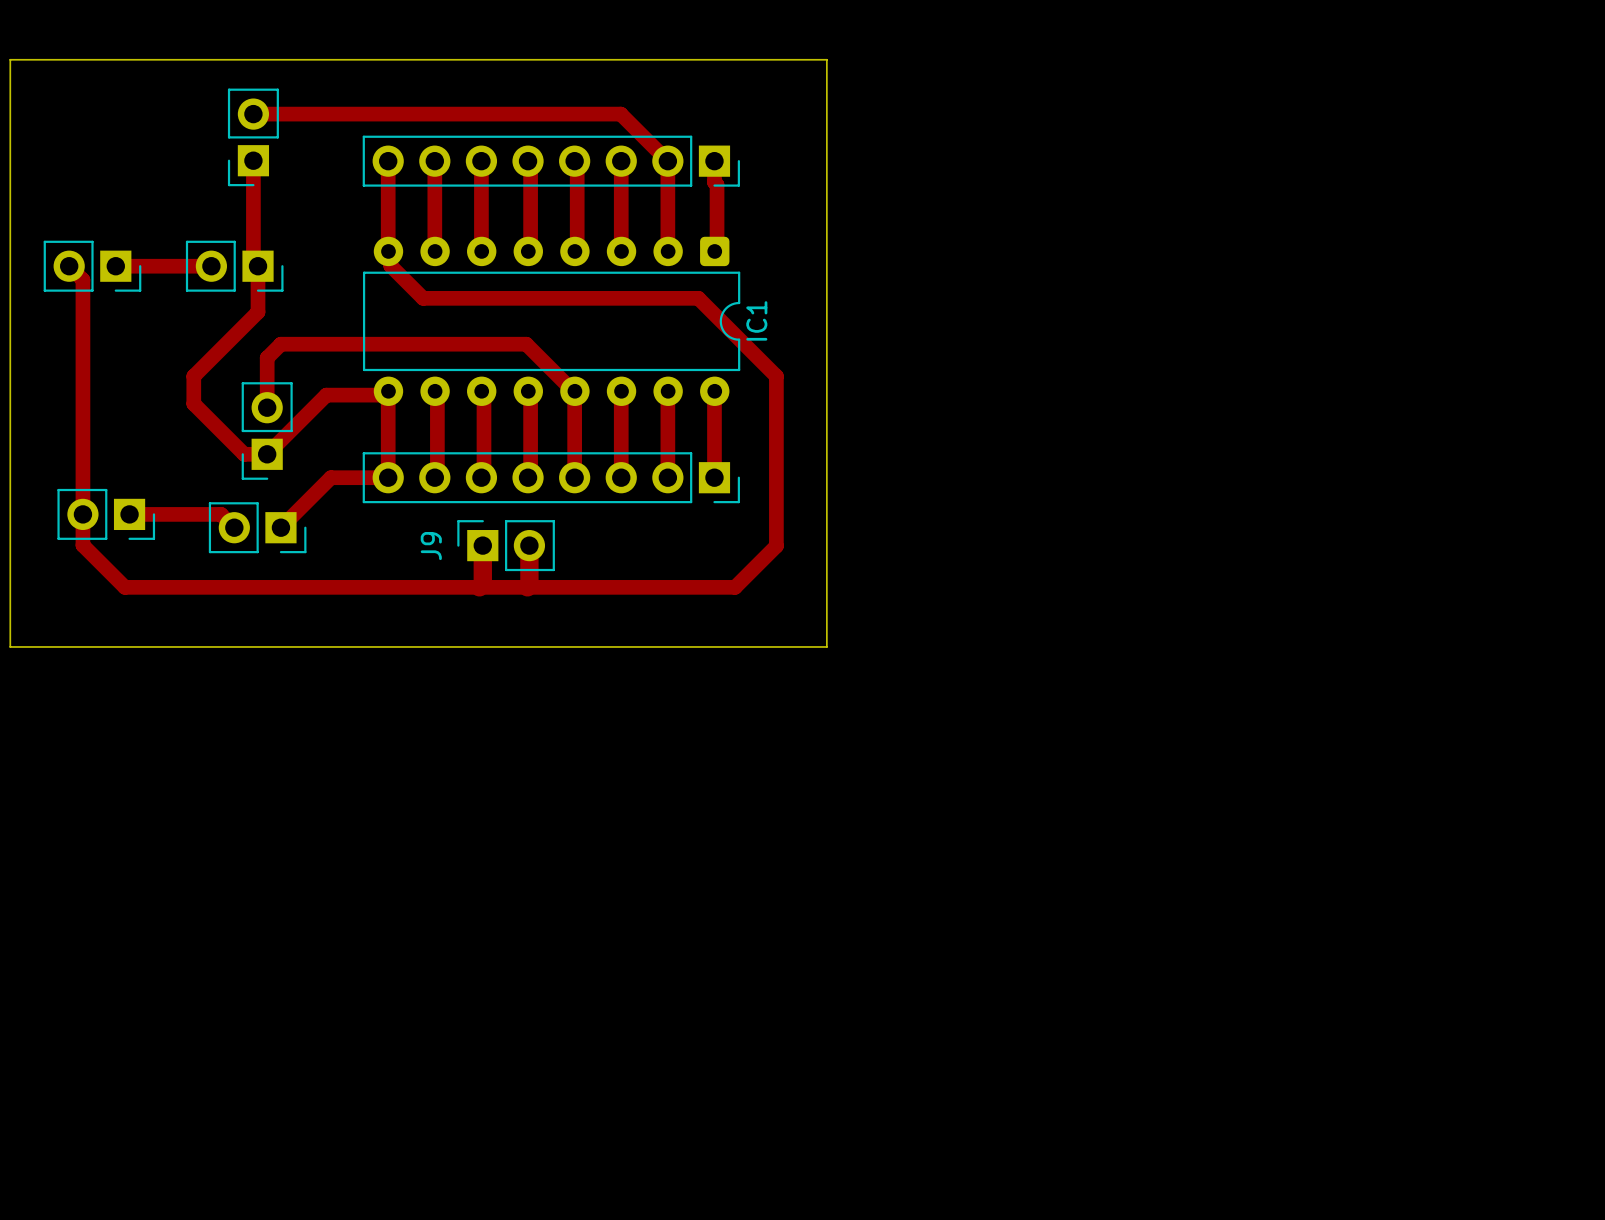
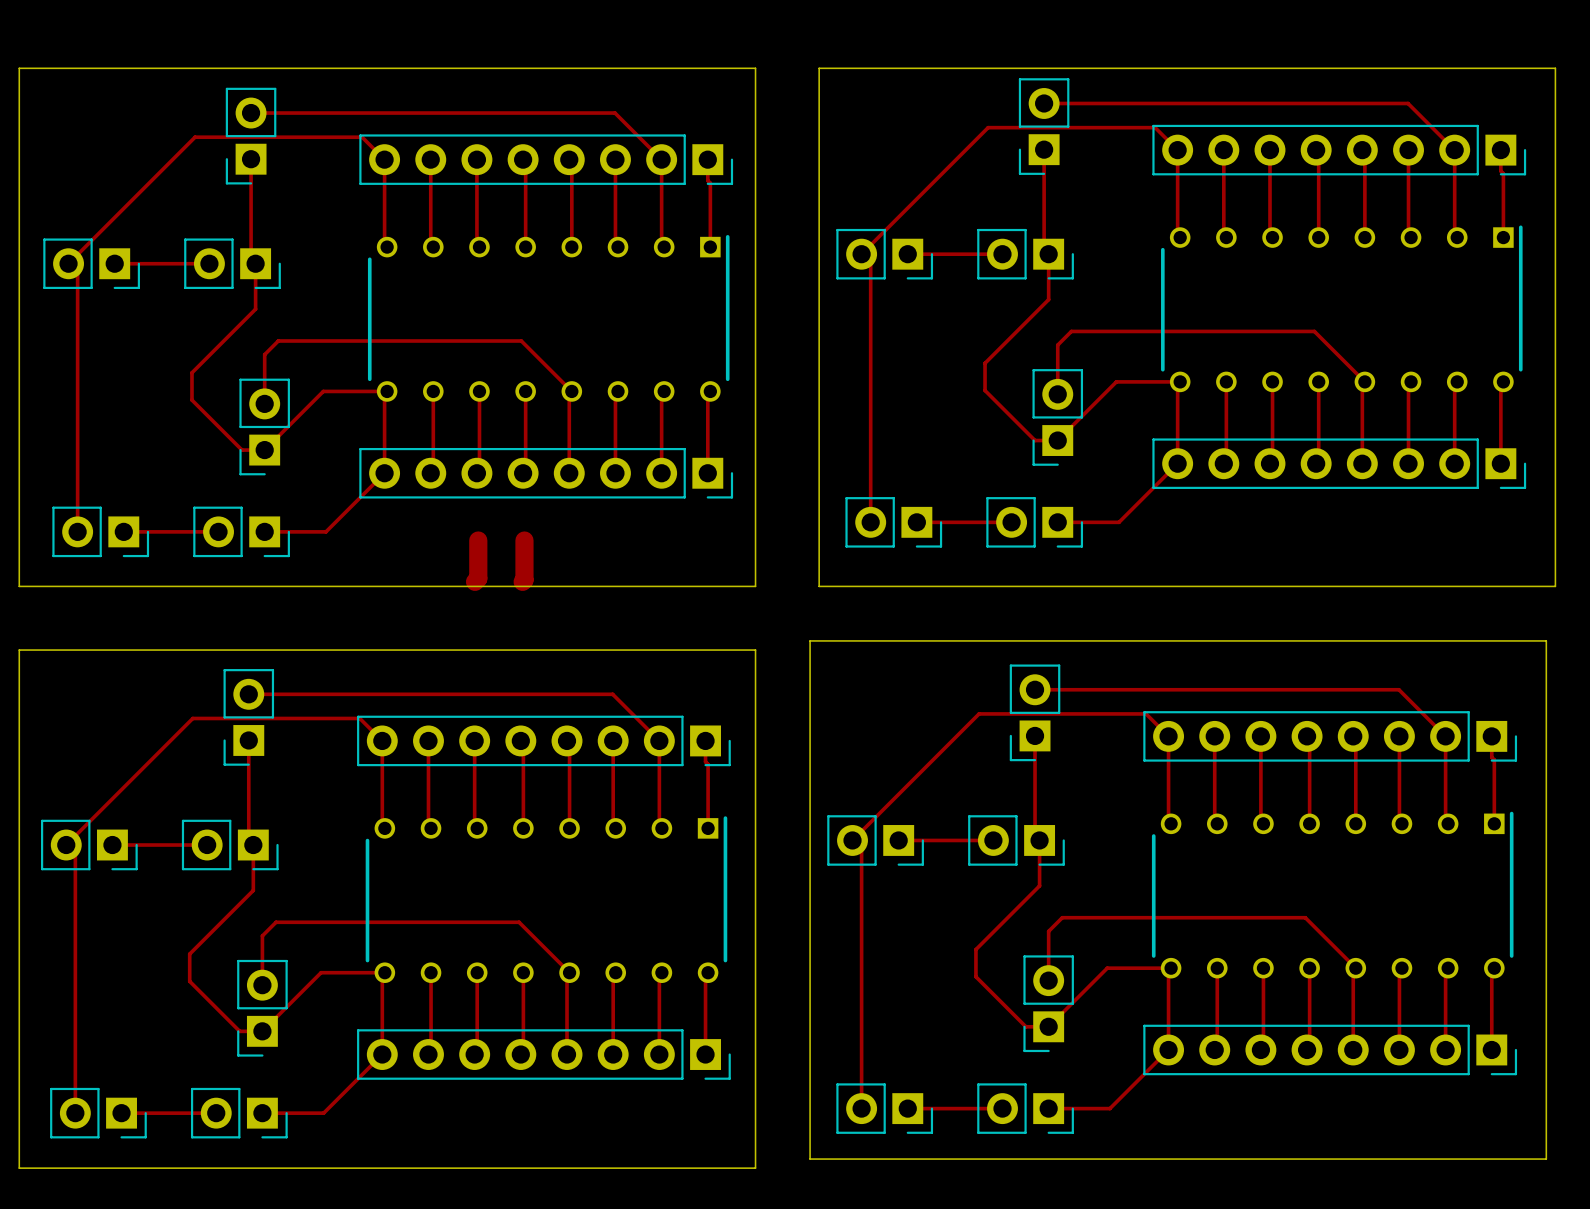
board edge: none -> (19, 68) (755, 68) (755, 586) (19, 586) (19, 68)
board edge: (826, 68) (826, 59) (10, 59) (10, 646) (817, 646) -> (819, 68) (1555, 68) (1555, 586) (819, 586)
track: none -> (1044, 103) (1408, 103) (1454, 150) (1454, 235) (1457, 237)
track width: thick (253, 114) (620, 114) (667, 161) (667, 246) (670, 249) -> thin (251, 113) (615, 113) (661, 159) (661, 244) (664, 247)
part: none -> (1044, 126)
track: none -> (1044, 149) (1044, 260) (1048, 264)
track: none -> (1223, 150) (1223, 235) (1226, 237)
track: none -> (1269, 150) (1269, 235) (1272, 237)
track: none -> (1316, 150) (1318, 152) (1318, 237)
part: none -> (1339, 150)
track: none -> (1362, 150) (1364, 152) (1364, 237)
track: none -> (1408, 150) (1408, 235) (1411, 237)
track: none -> (1500, 150) (1500, 171) (1503, 173) (1503, 237)
track width: thick (253, 160) (253, 272) (258, 276) -> thin (251, 159) (251, 269) (255, 274)
track: none -> (384, 159) (362, 137) (195, 137) (68, 263)
track width: thick (388, 161) (388, 246) (390, 249) -> thin (384, 159) (384, 244) (387, 247)
track width: thick (434, 161) (434, 246) (437, 249) -> thin (430, 159) (430, 244) (433, 247)
track width: thick (481, 161) (481, 246) (483, 249) -> thin (476, 159) (476, 244) (479, 247)
track width: thick (528, 161) (530, 163) (530, 249) -> thin (523, 159) (525, 162) (525, 247)
track width: thick (574, 161) (577, 163) (577, 249) -> thin (569, 159) (571, 162) (571, 247)
track width: thick (621, 161) (621, 246) (623, 249) -> thin (615, 159) (615, 244) (618, 247)
track width: thick (714, 161) (714, 182) (717, 184) (717, 249) -> thin (707, 159) (707, 180) (710, 183) (710, 247)
track: none -> (1180, 237) (1177, 235) (1177, 150) (1155, 127) (988, 127) (861, 254) (870, 263) (870, 522)
track: (390, 249) (390, 265) (423, 298) (698, 298) (776, 376) (776, 546) (735, 587) (124, 587) (82, 545) (82, 279) (78, 275) -> (77, 531) (77, 272)
part: none -> (884, 254)
track: none -> (907, 254) (1002, 254)
part: none -> (1025, 254)
track: none -> (1048, 254) (1048, 299) (985, 363) (985, 390) (1035, 440) (1057, 440) (1116, 381) (1180, 381) (1177, 384) (1177, 463) (1119, 522) (1057, 522)
track width: thick (115, 266) (211, 266) -> thin (114, 263) (209, 263)
track width: thick (258, 266) (258, 312) (193, 376) (193, 403) (244, 454) (267, 454) (326, 395) (390, 395) (388, 397) (388, 477) -> thin (255, 263) (255, 309) (191, 372) (191, 400) (241, 450) (264, 450) (323, 391) (387, 391) (384, 393) (384, 473)
part: none -> (1341, 308)
IC1: (551, 321) -> none
part: none -> (548, 318)
track: none -> (1226, 381) (1226, 461) (1223, 463)
track: none -> (1272, 381) (1272, 461) (1269, 463)
track: none -> (1318, 381) (1318, 461) (1316, 463)
track: none -> (1411, 381) (1408, 384) (1408, 463)
track: none -> (1457, 381) (1454, 384) (1454, 463)
track: none -> (1503, 381) (1500, 384) (1500, 463)
track width: thick (437, 395) (437, 475) (434, 477) -> thin (433, 391) (433, 470) (430, 473)
track width: thick (483, 395) (483, 475) (481, 477) -> thin (479, 391) (479, 470) (476, 473)
track width: thick (530, 395) (530, 475) (528, 477) -> thin (525, 391) (525, 470) (523, 473)
track width: thick (623, 395) (621, 397) (621, 477) -> thin (618, 391) (615, 393) (615, 473)
track width: thick (670, 395) (667, 397) (667, 477) -> thin (664, 391) (661, 393) (661, 473)
track width: thick (717, 395) (714, 397) (714, 477) -> thin (710, 391) (707, 393) (707, 473)
track: none -> (1057, 394) (1057, 345) (1071, 331) (1314, 331) (1364, 381) (1362, 384) (1362, 463)
track width: thick (267, 407) (267, 357) (280, 344) (526, 344) (577, 395) (574, 397) (574, 477) -> thin (264, 403) (264, 354) (278, 341) (521, 341) (571, 391) (569, 393) (569, 473)
part: none -> (1057, 417)
part: none -> (1339, 463)
track: (388, 477) (330, 477) (280, 527) -> (384, 473) (325, 531) (264, 531)
part position: (106, 514) -> (100, 531)
track: (129, 514) (221, 514) (234, 527) -> none
part position: (257, 527) -> (241, 531)
part: none -> (893, 522)
track: none -> (916, 522) (1011, 522)
part: none -> (1034, 522)
track: none -> (123, 531) (218, 531)
J9: (506, 545) -> none
board edge: (826, 591) (826, 646) -> (810, 640) (810, 1159) (1546, 1159) (1546, 640) (819, 640)
board edge: none -> (19, 650) (19, 1168) (755, 1168) (755, 650) (19, 650)
track: none -> (1035, 689) (1398, 689) (1445, 736) (1445, 821) (1448, 823)
track: none -> (248, 694) (612, 694) (659, 740) (659, 825) (661, 828)
part: none -> (1035, 712)
part: none -> (248, 717)
track: none -> (1035, 735) (1035, 846) (1039, 850)
track: none -> (1214, 736) (1214, 821) (1217, 823)
track: none -> (1260, 736) (1260, 821) (1263, 823)
track: none -> (1307, 736) (1309, 738) (1309, 823)
part: none -> (1330, 736)
track: none -> (1353, 736) (1355, 738) (1355, 823)
track: none -> (1399, 736) (1399, 821) (1401, 823)
track: none -> (1491, 736) (1491, 757) (1494, 759) (1494, 823)
track: none -> (248, 740) (248, 850) (253, 855)
track: none -> (428, 740) (428, 825) (431, 828)
track: none -> (474, 740) (474, 825) (477, 828)
track: none -> (520, 740) (523, 743) (523, 828)
part: none -> (543, 740)
track: none -> (567, 740) (569, 743) (569, 828)
track: none -> (613, 740) (613, 825) (615, 828)
track: none -> (705, 740) (705, 761) (708, 764) (708, 828)
track: none -> (1171, 823) (1168, 821) (1168, 736) (1146, 713) (979, 713) (852, 840) (861, 849) (861, 1108)
track: none -> (384, 828) (382, 825) (382, 740) (359, 718) (192, 718) (66, 845) (75, 854) (75, 1113)
part: none -> (875, 840)
track: none -> (898, 840) (993, 840)
part: none -> (1016, 840)
track: none -> (1039, 840) (1039, 885) (975, 949) (975, 976) (1025, 1026) (1048, 1026) (1107, 968) (1171, 968) (1168, 970) (1168, 1049) (1109, 1108) (1048, 1108)
part: none -> (89, 845)
track: none -> (112, 845) (207, 845)
part: none -> (230, 845)
track: none -> (253, 845) (253, 890) (189, 954) (189, 981) (239, 1031) (262, 1031) (321, 972) (384, 972) (382, 975) (382, 1054) (323, 1113) (262, 1113)
part: none -> (1332, 895)
part: none -> (546, 899)
track: none -> (1217, 968) (1217, 1047) (1214, 1049)
track: none -> (1263, 968) (1263, 1047) (1260, 1049)
track: none -> (1309, 968) (1309, 1047) (1307, 1049)
track: none -> (1401, 968) (1399, 970) (1399, 1049)
track: none -> (1448, 968) (1445, 970) (1445, 1049)
track: none -> (1494, 968) (1491, 970) (1491, 1049)
track: none -> (431, 972) (431, 1051) (428, 1054)
track: none -> (477, 972) (477, 1051) (474, 1054)
track: none -> (523, 972) (523, 1051) (520, 1054)
track: none -> (615, 972) (613, 975) (613, 1054)
track: none -> (661, 972) (659, 975) (659, 1054)
track: none -> (708, 972) (705, 975) (705, 1054)
track: none -> (1048, 980) (1048, 931) (1062, 917) (1305, 917) (1355, 968) (1353, 970) (1353, 1049)
track: none -> (262, 985) (262, 935) (276, 922) (519, 922) (569, 972) (567, 975) (567, 1054)
part: none -> (1048, 1003)
part: none -> (262, 1008)
part: none -> (1330, 1049)
part: none -> (543, 1054)
part: none -> (884, 1108)
track: none -> (907, 1108) (1002, 1108)
part: none -> (1025, 1108)
part: none -> (98, 1113)
track: none -> (121, 1113) (216, 1113)
part: none -> (239, 1113)

